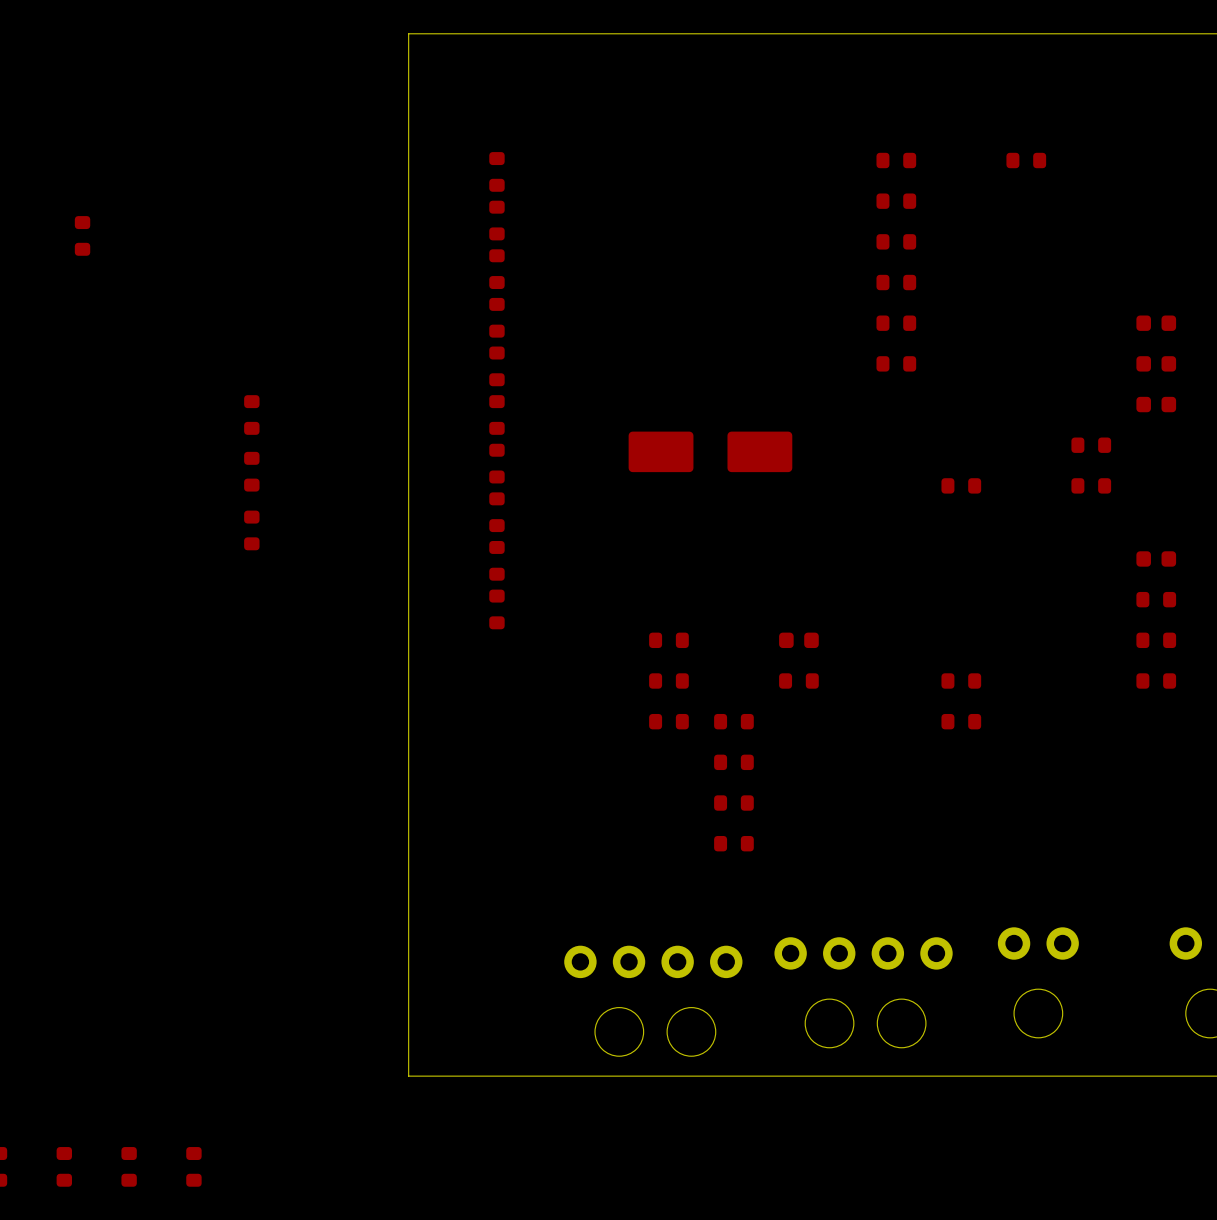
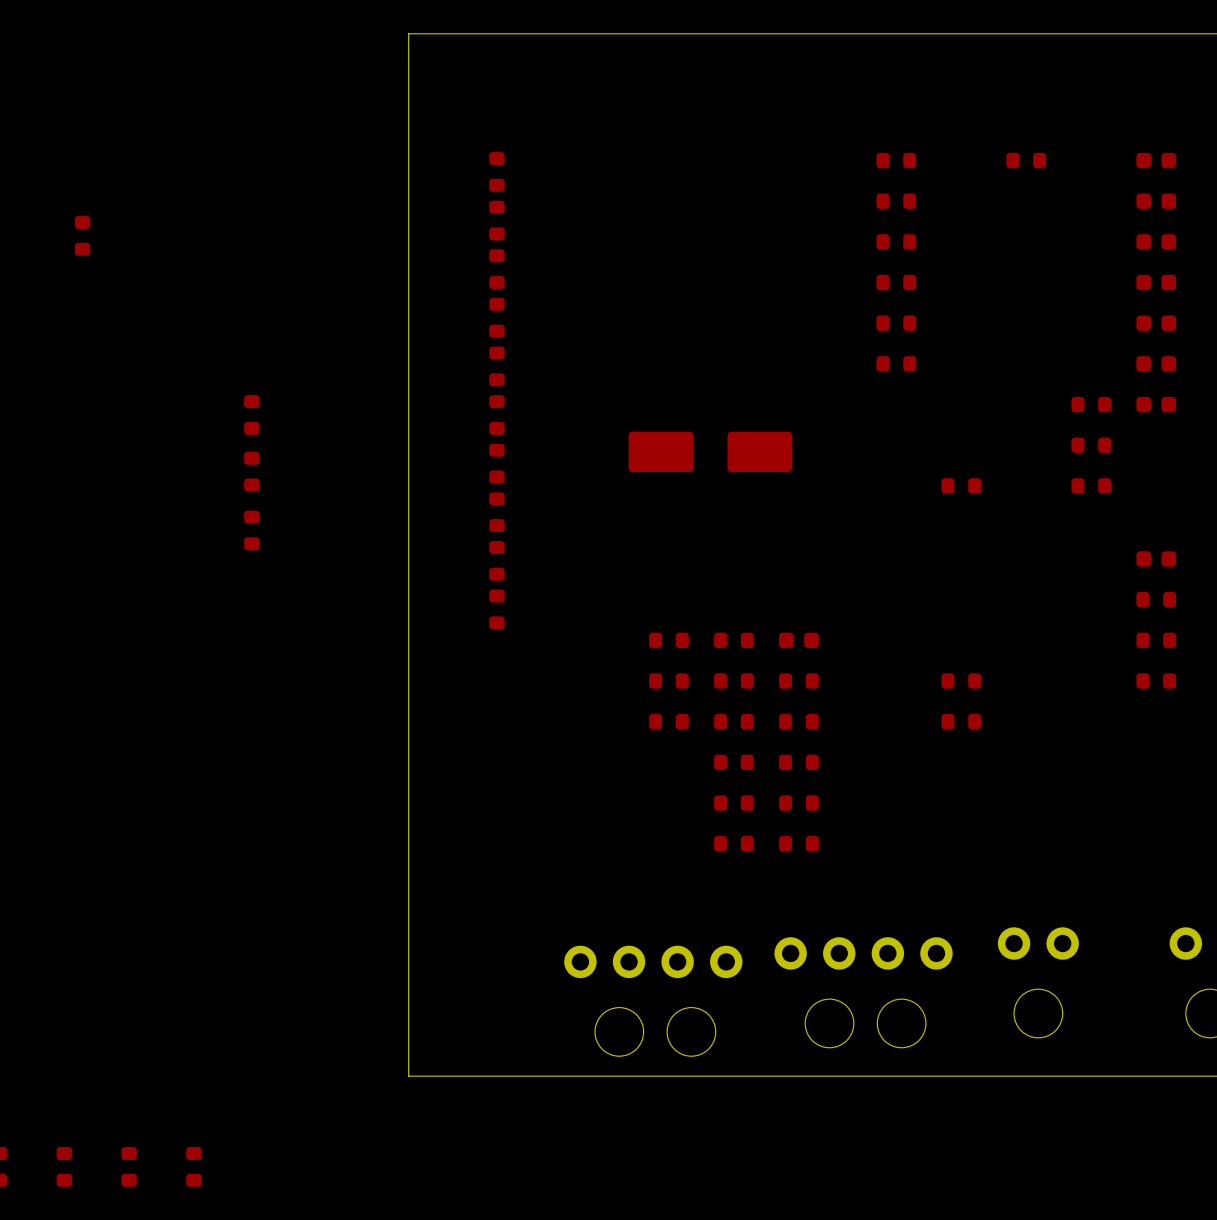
part: none -> (1156, 160)
part: none -> (1156, 201)
part: none -> (1156, 241)
part: none -> (1156, 282)
part: none -> (1091, 404)
part: none -> (733, 640)
part: none -> (733, 680)
part: none -> (798, 721)
part: none -> (798, 762)
part: none -> (798, 803)
part: none -> (798, 843)

